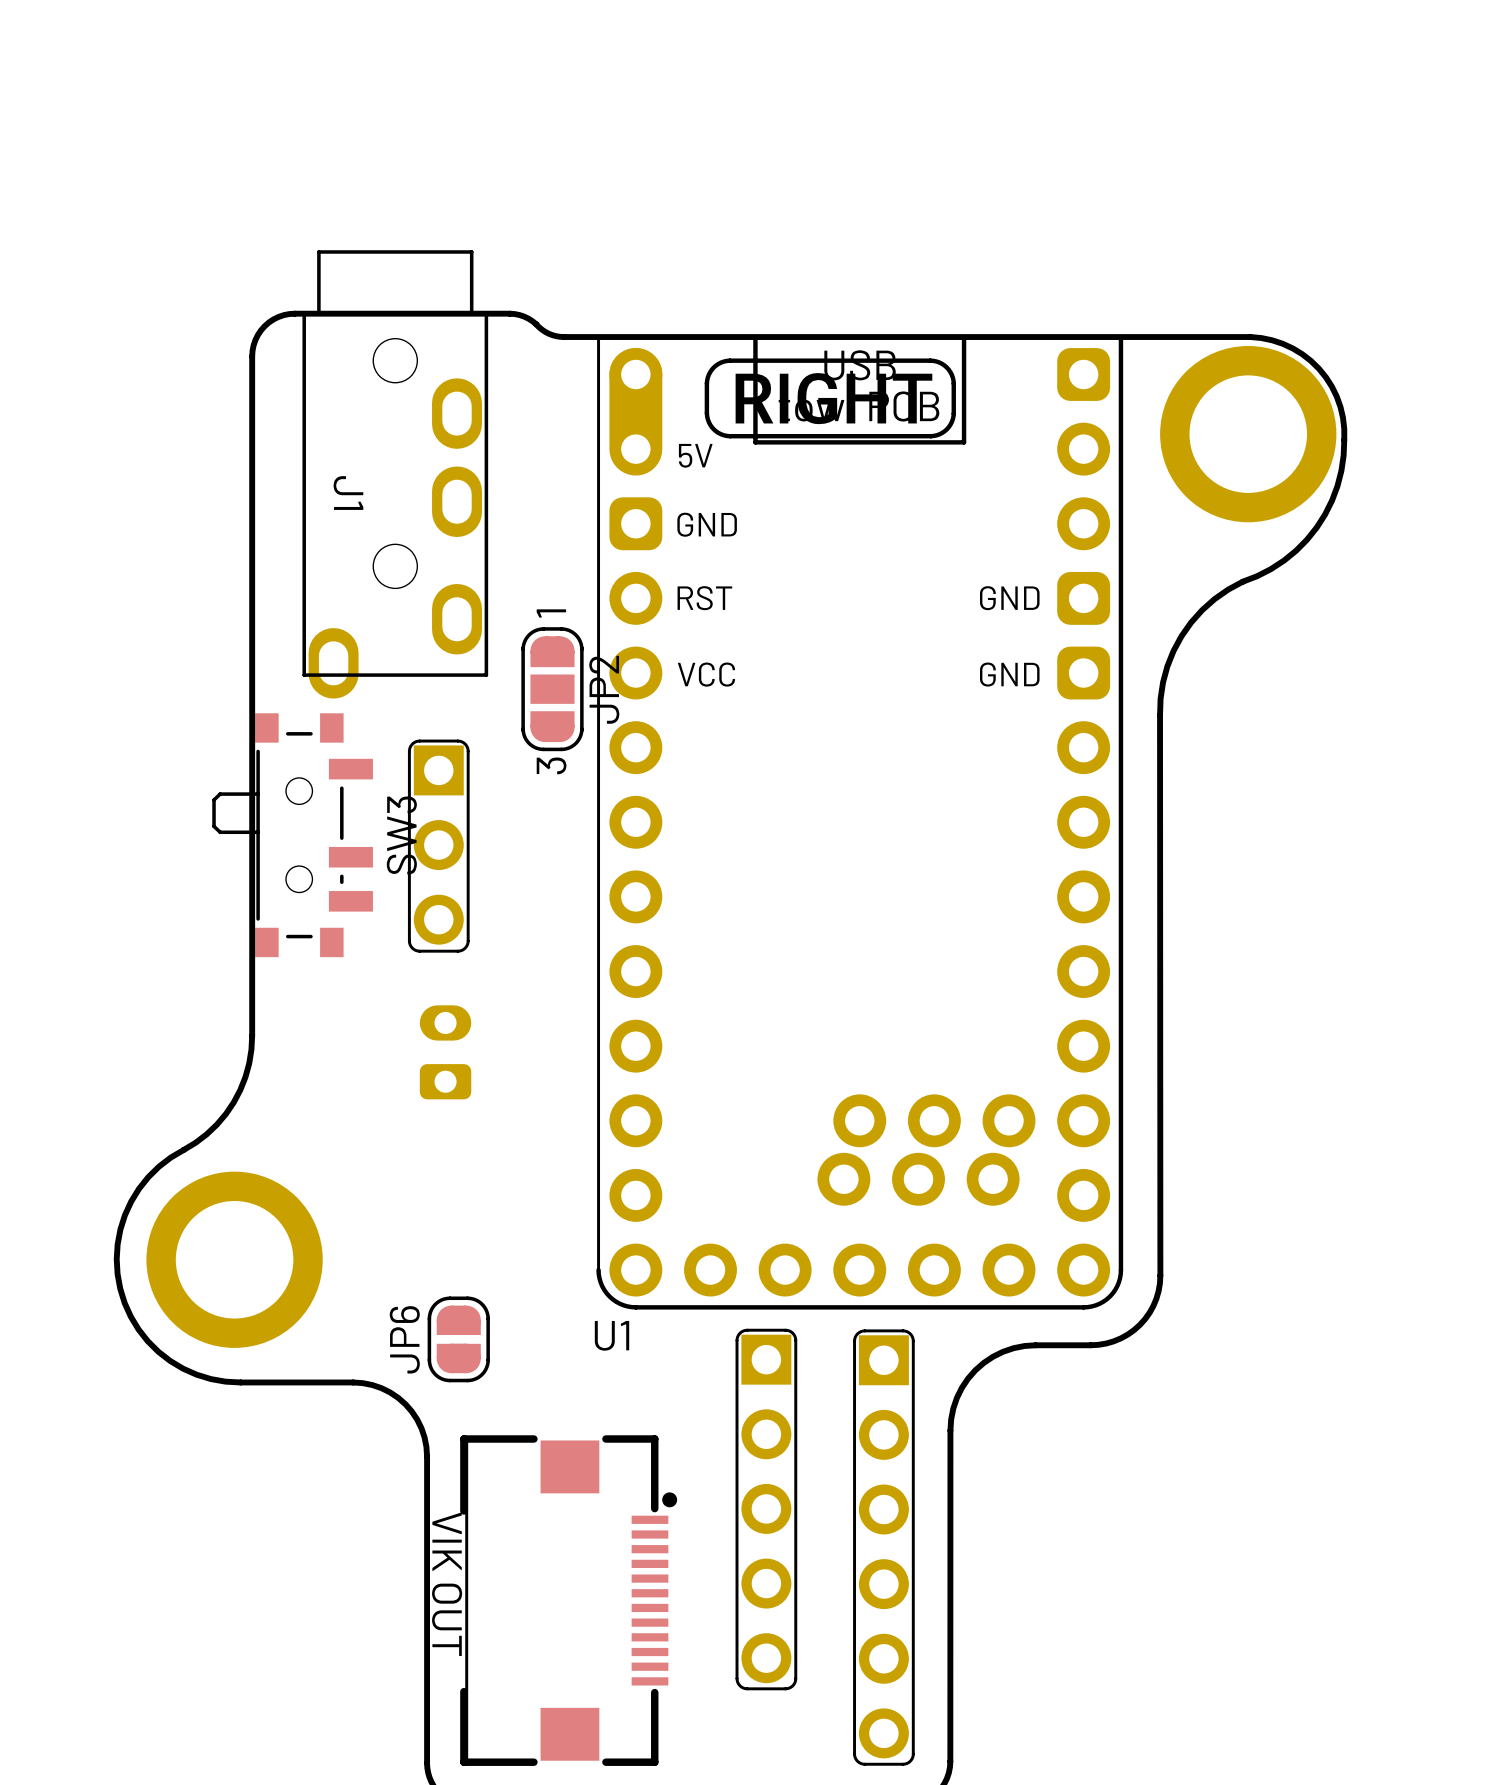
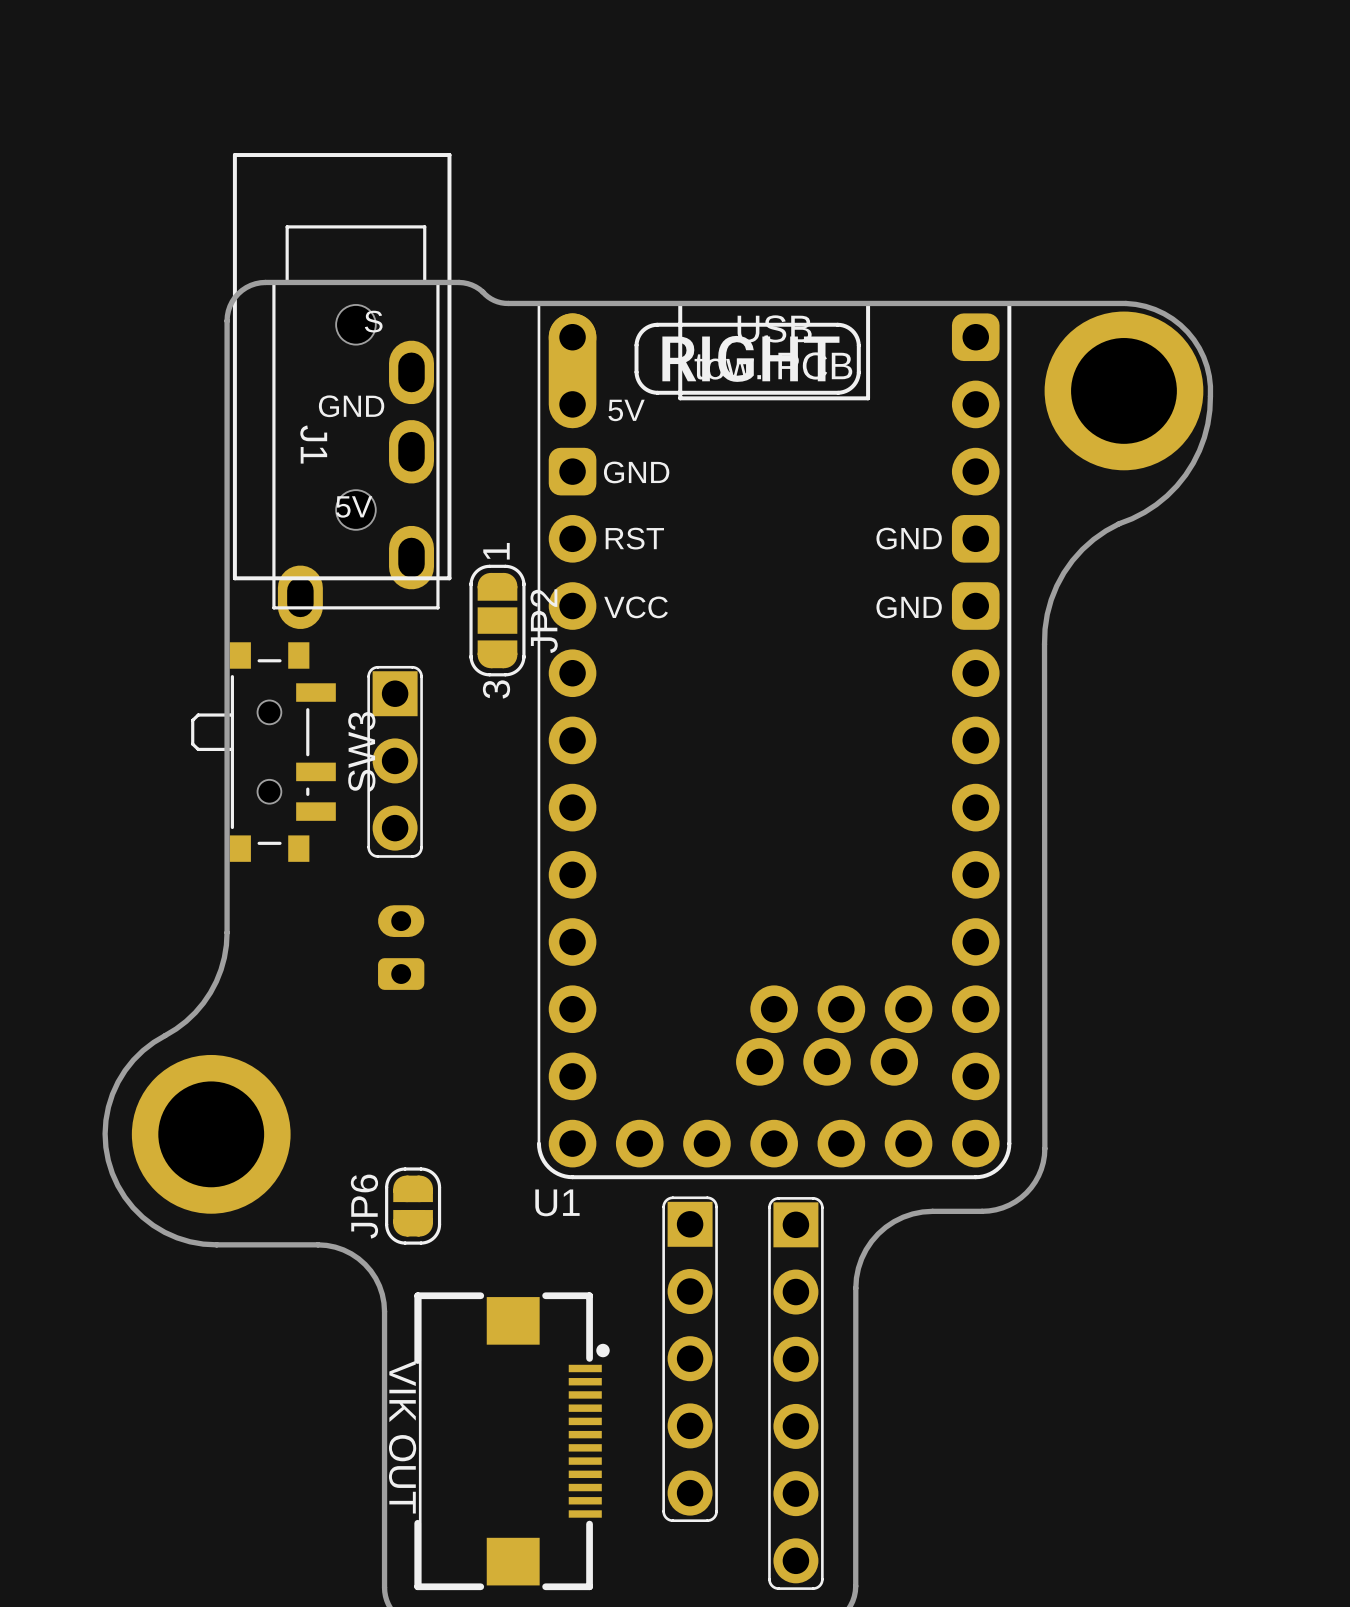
line: none -> (234, 155) (449, 155) (449, 578) (234, 578) (234, 155)
text: none -> S (373, 321)
text: none -> GND (351, 406)
text: none -> 5V (354, 506)

